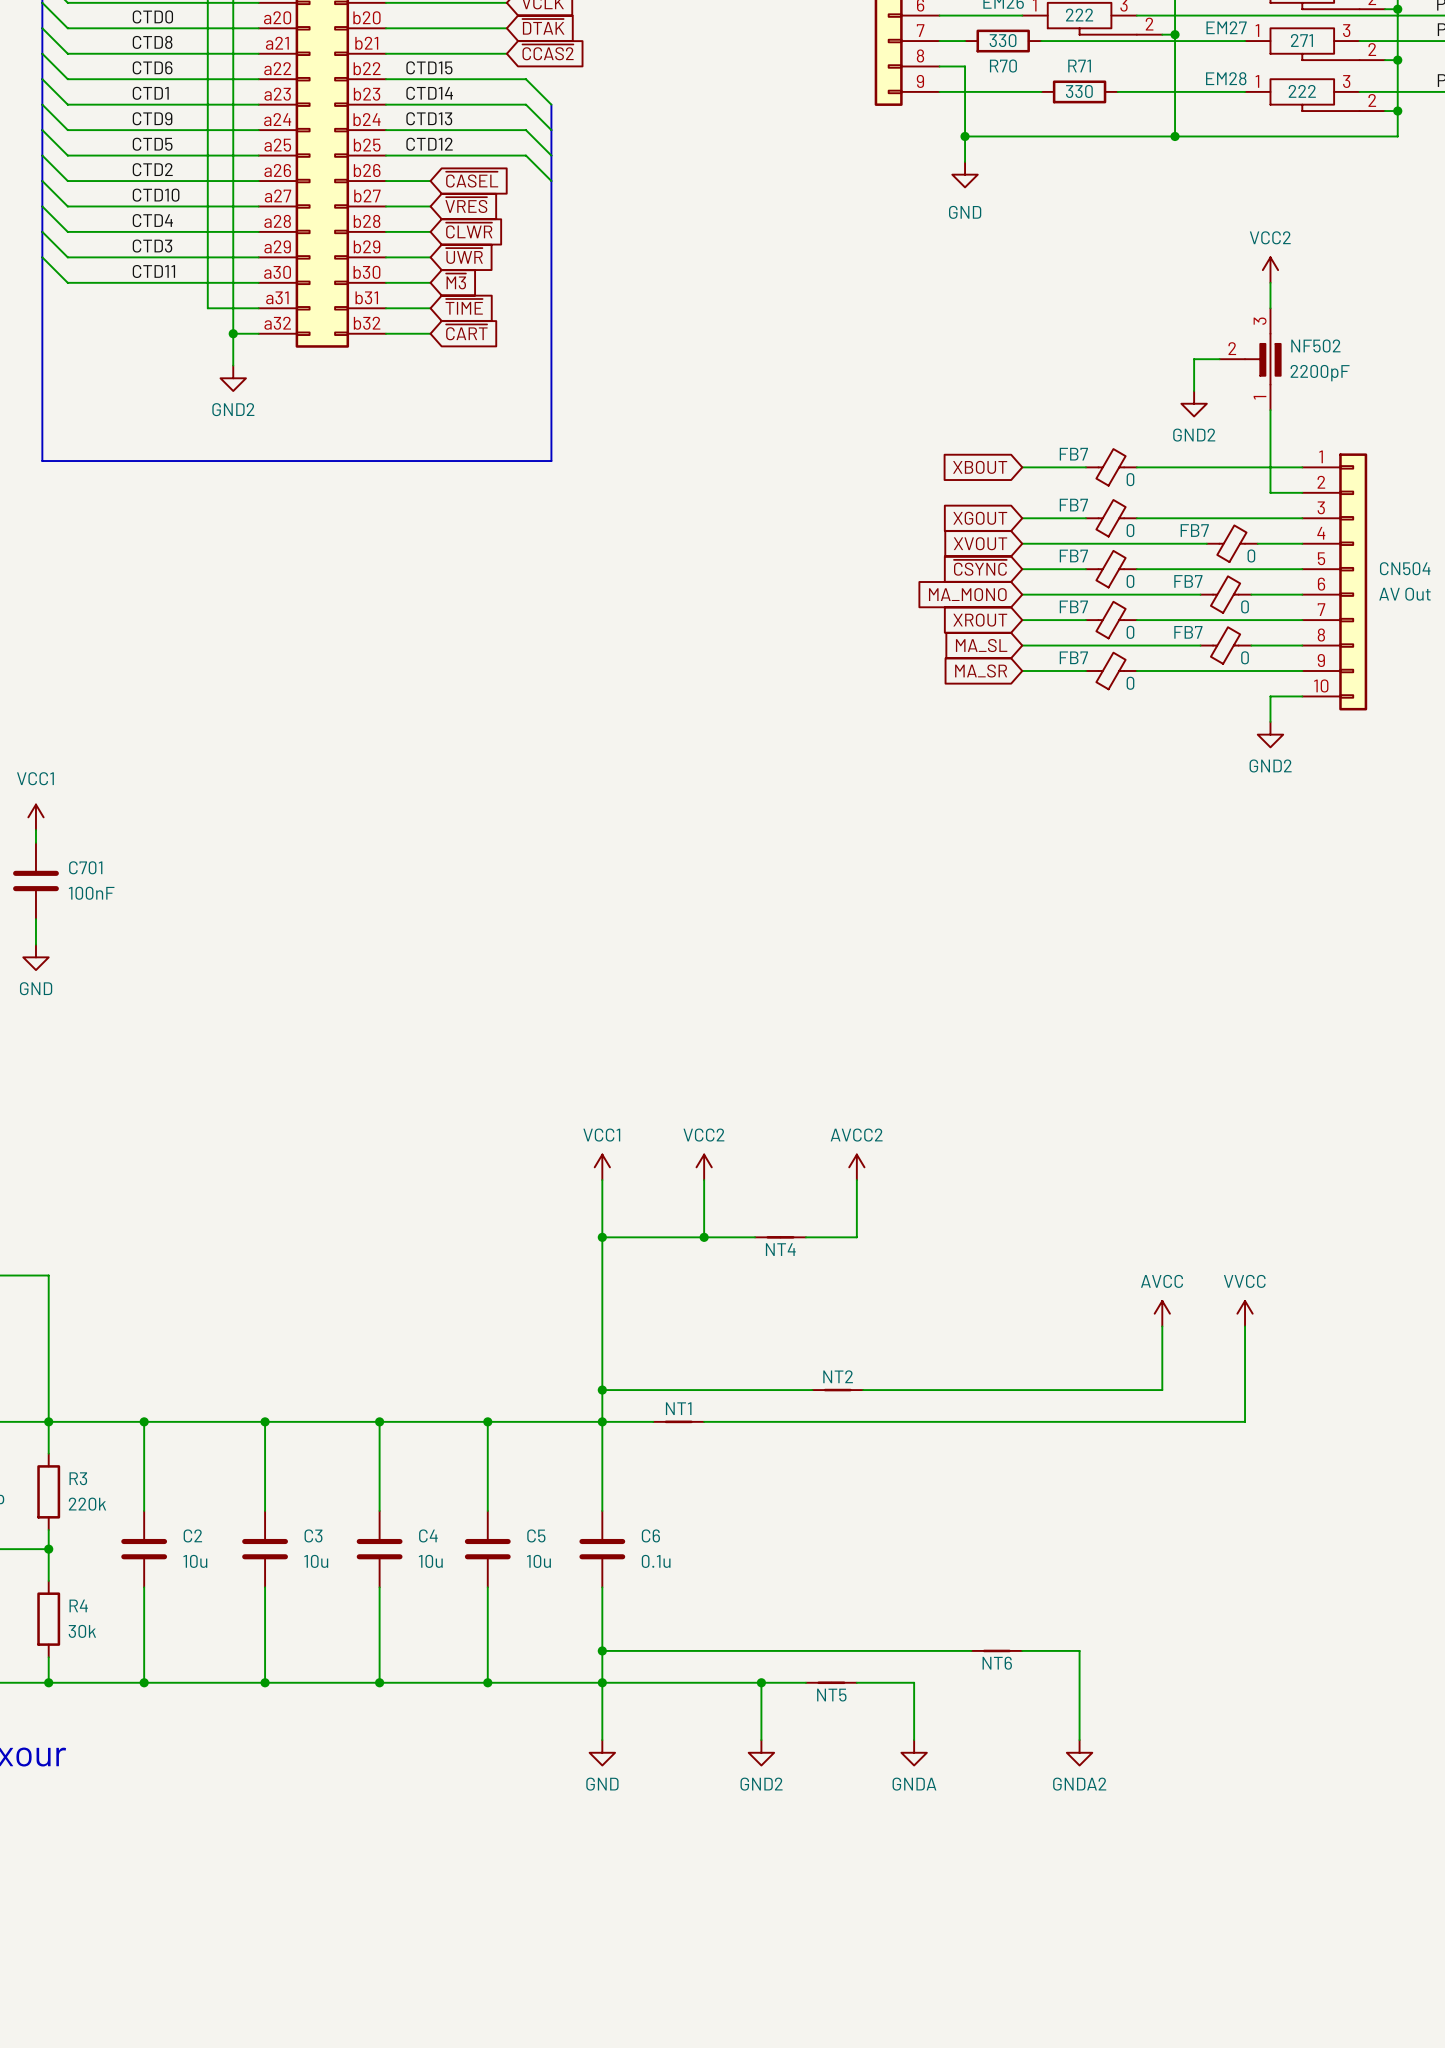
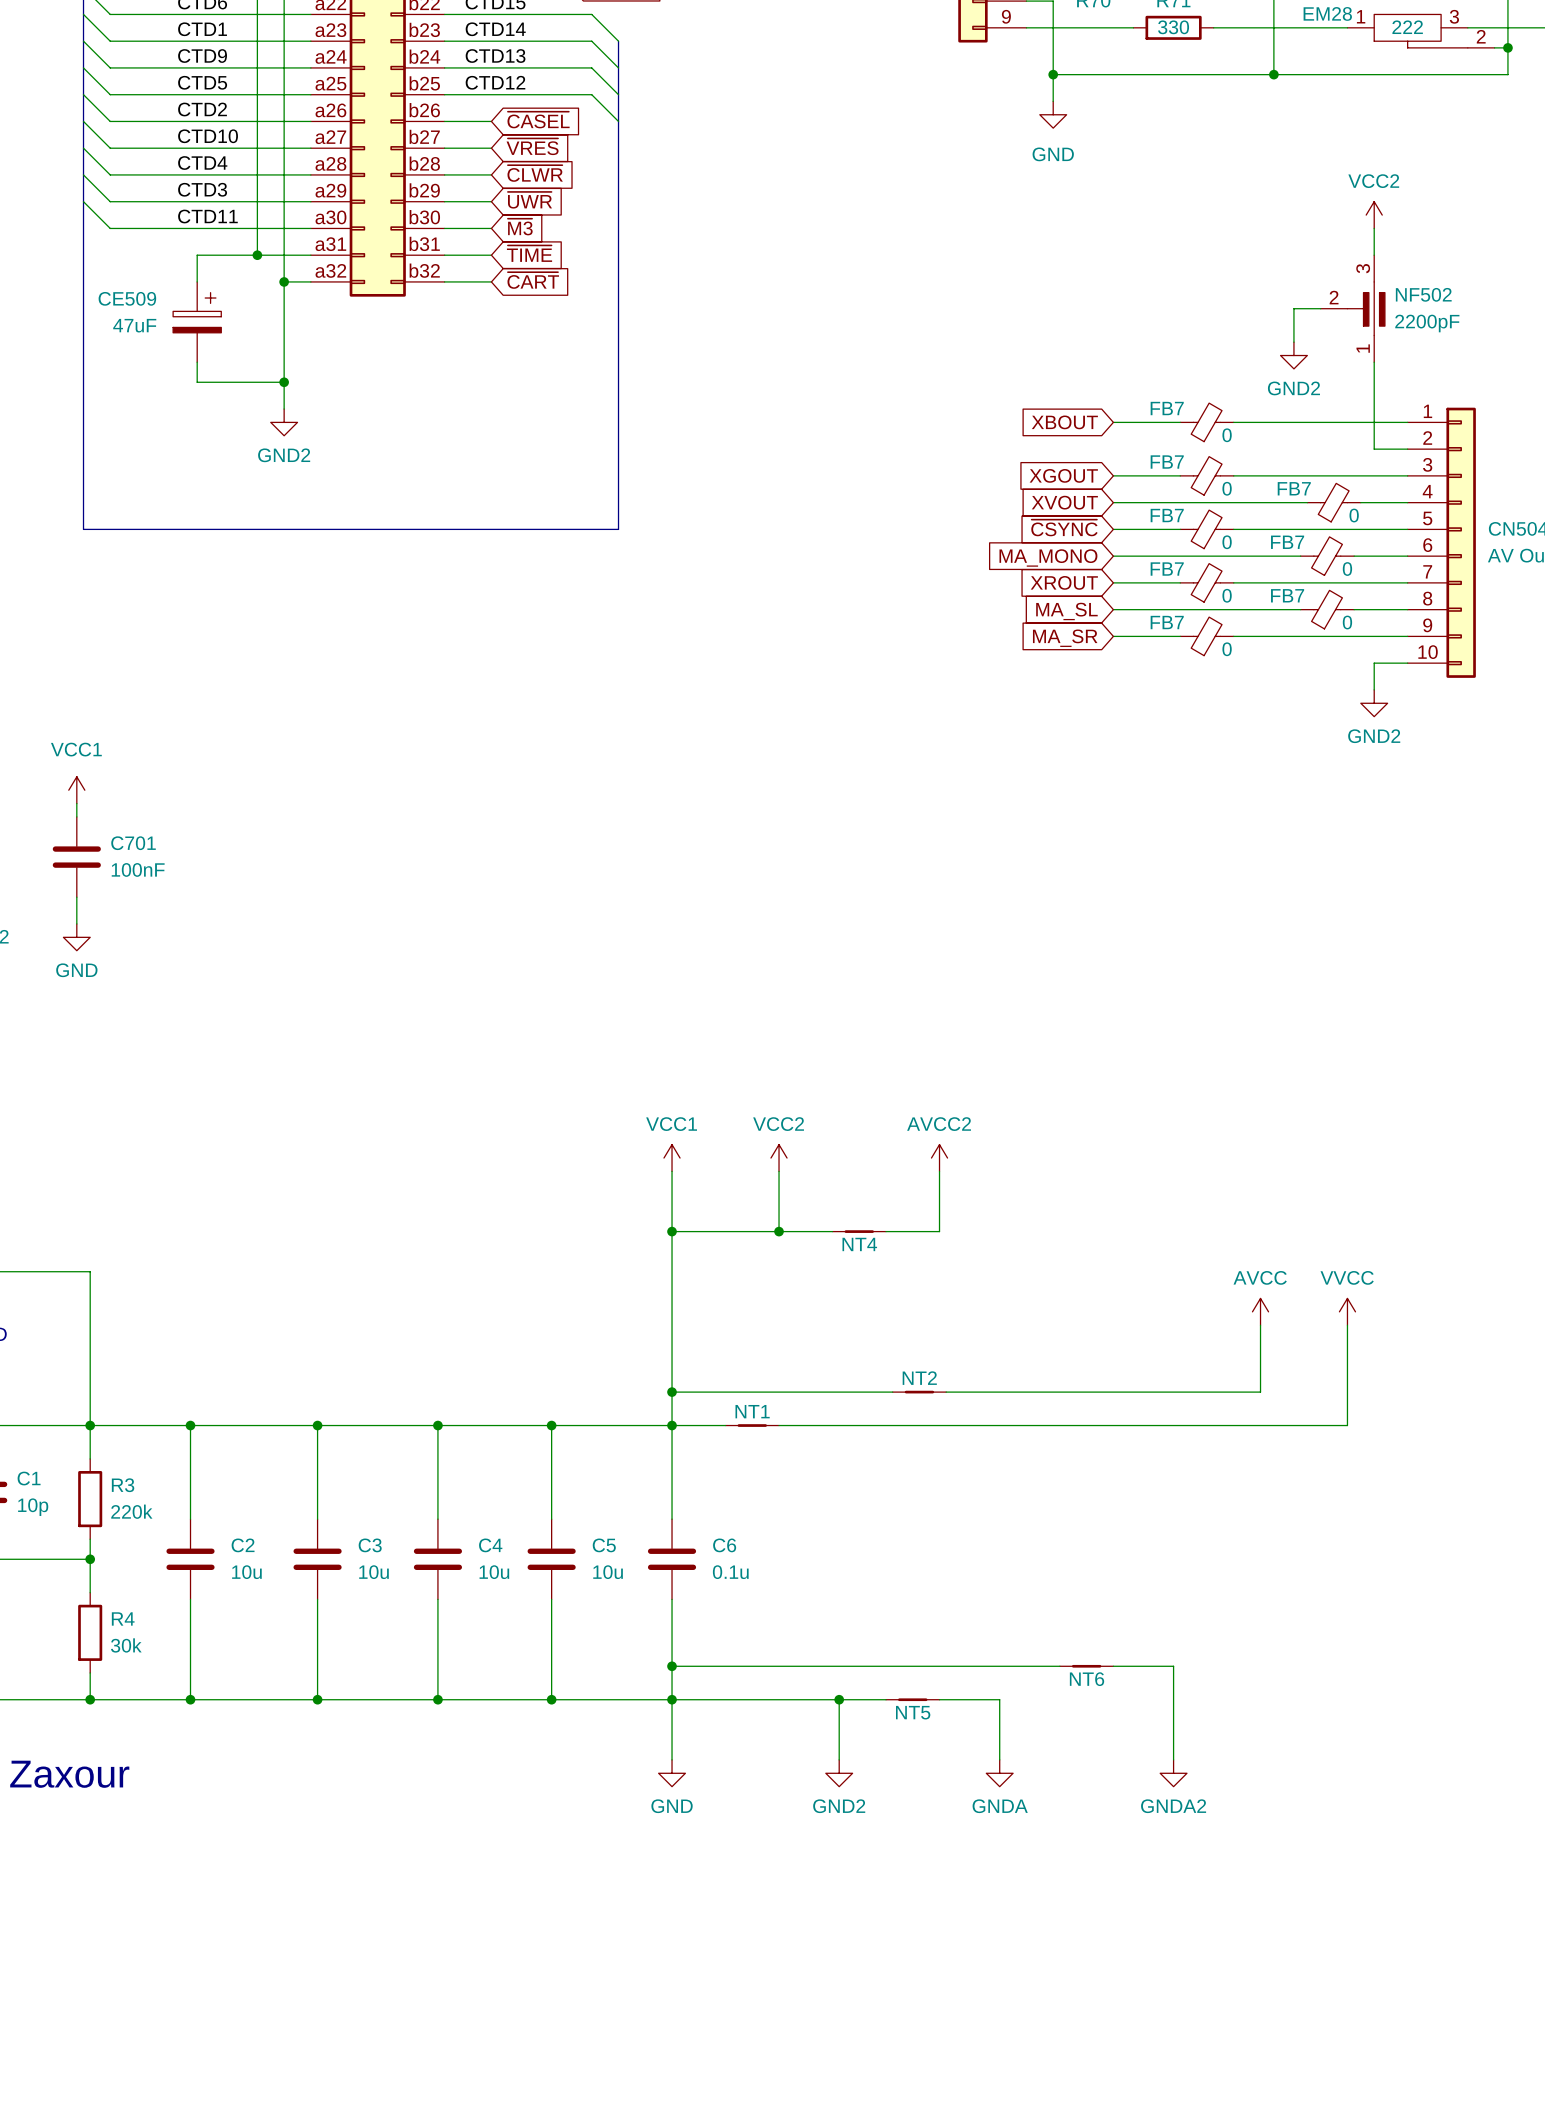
wire: none -> (257, 255) (197, 255) (197, 281)
junction: none -> (257, 255)
wire: none -> (284, 315) (284, 409)
CE509: none -> 47uF (197, 322)
power symbol position: GND2 (233, 378) -> GND2 (284, 422)
wire: none -> (197, 362) (197, 382) (284, 382)
junction: none -> (284, 382)
bus: (42, 461) (551, 461) -> (83, 415) (83, 529) (618, 529) (618, 415)

